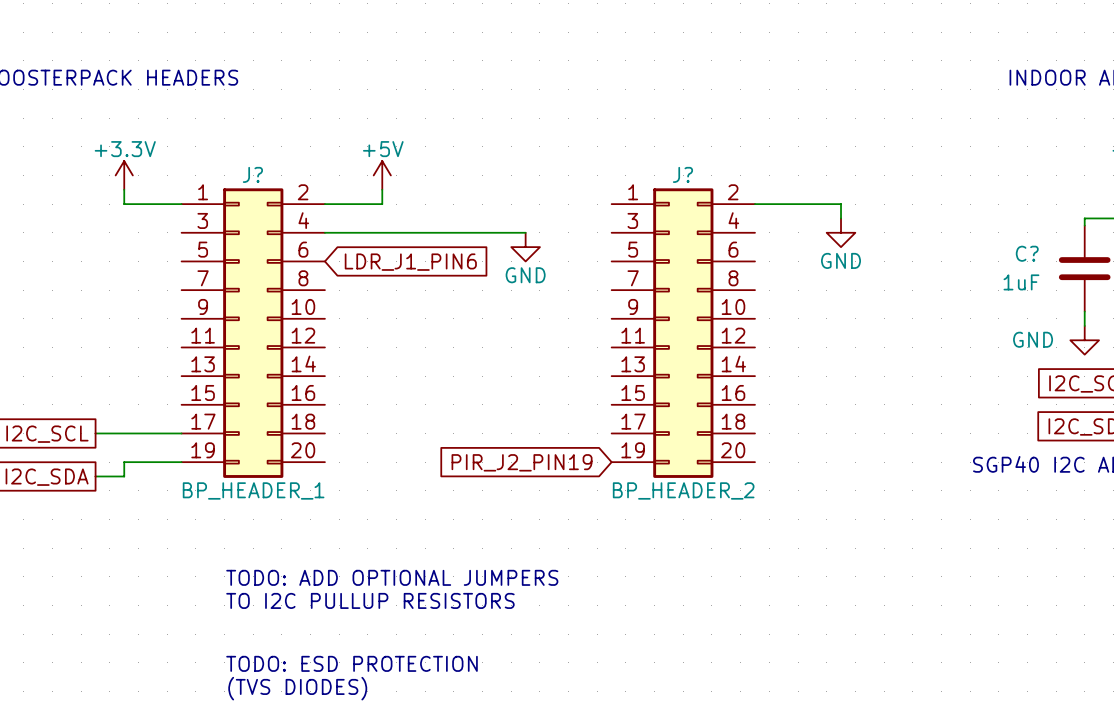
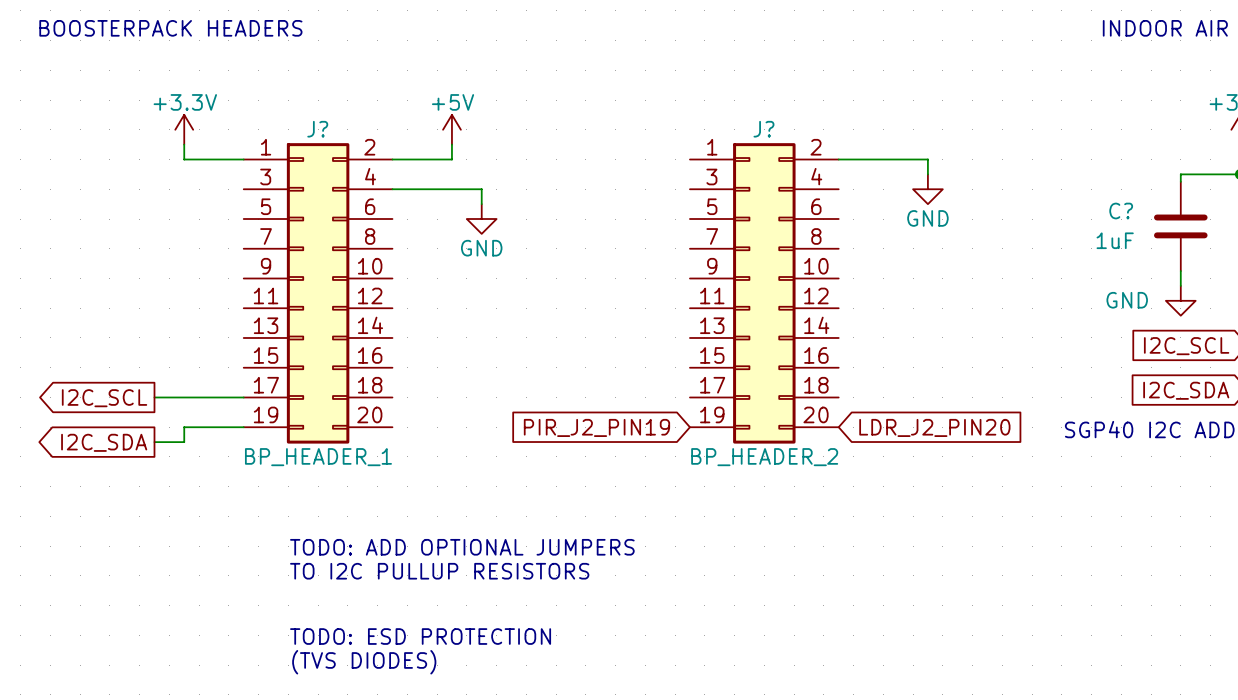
wire: (410, 232) (525, 232) -> (481, 189) (481, 204)
power symbol position: GND (525, 247) -> GND (481, 219)
global label: LDR_J1_PIN6 (410, 262) -> none
global label: none -> LDR_J2_PIN20 (934, 427)

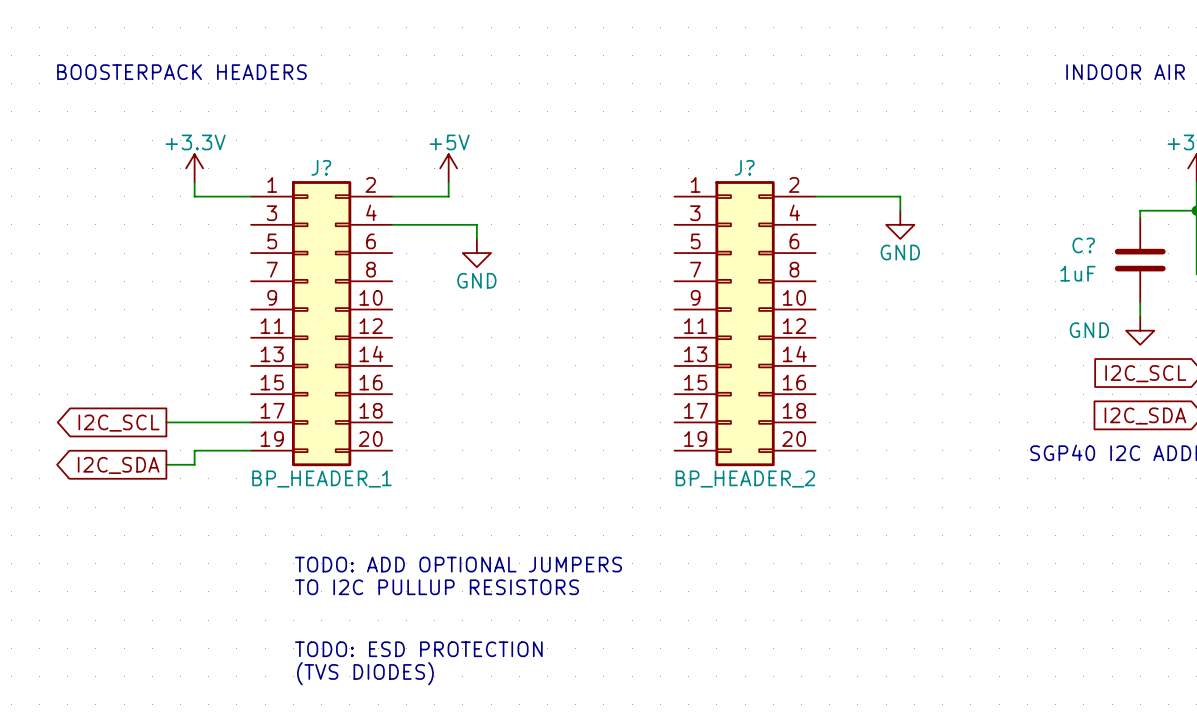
global label: PIR_J2_PIN19 (596, 427) -> none
global label: LDR_J2_PIN20 (934, 427) -> none

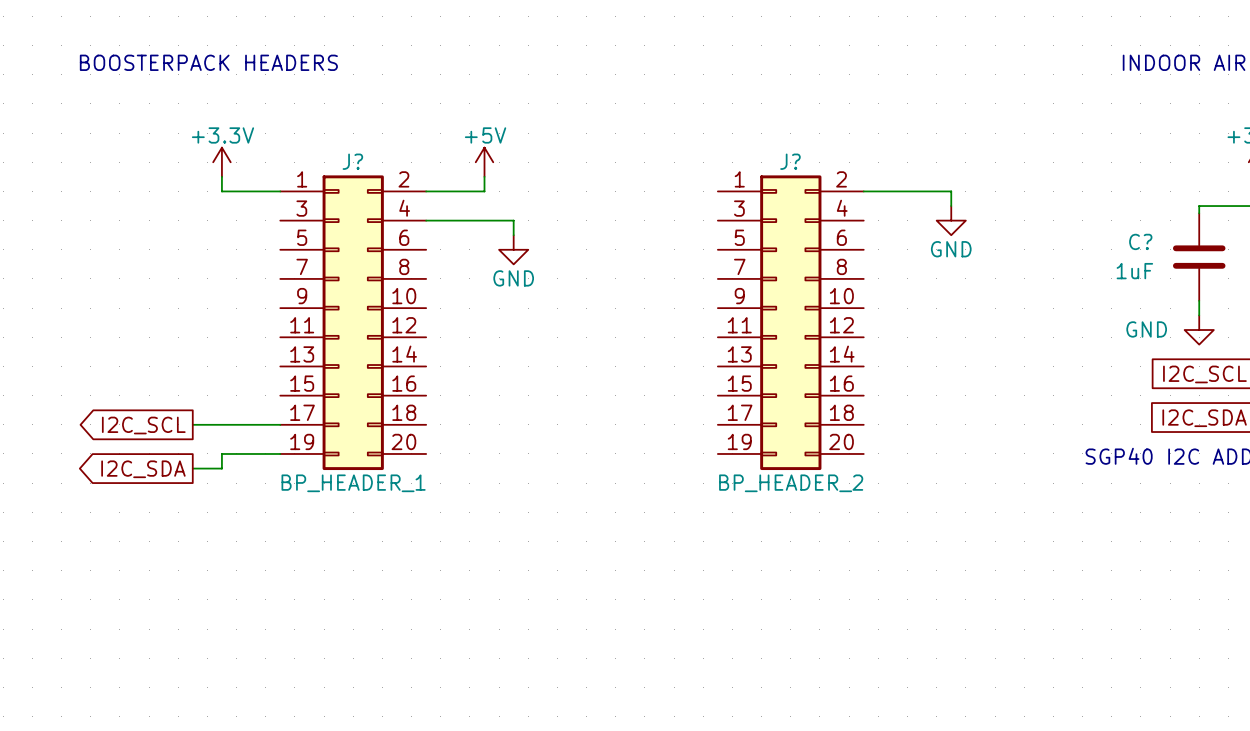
text: TODO: ADD OPTIONAL JUMPERS (458, 564) -> none
text: TO I2C PULLUP RESISTORS (437, 587) -> none
text: TODO: ESD PROTECTION (418, 649) -> none
text: (TVS DIODES) (365, 673) -> none

